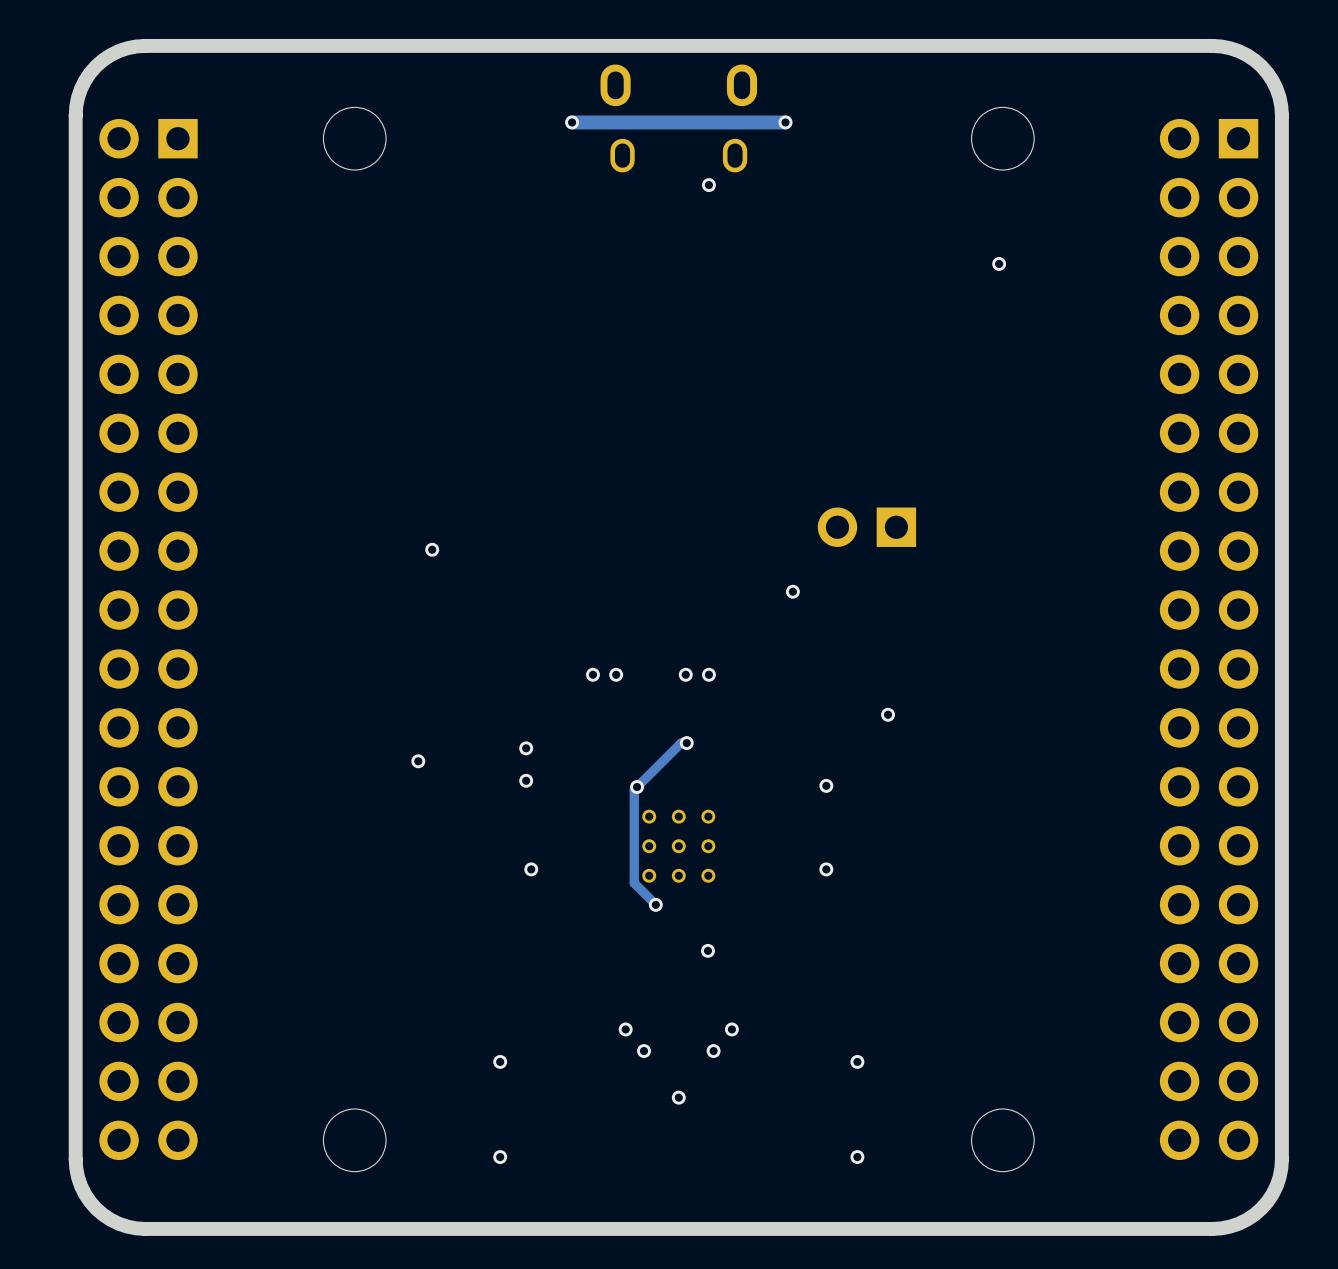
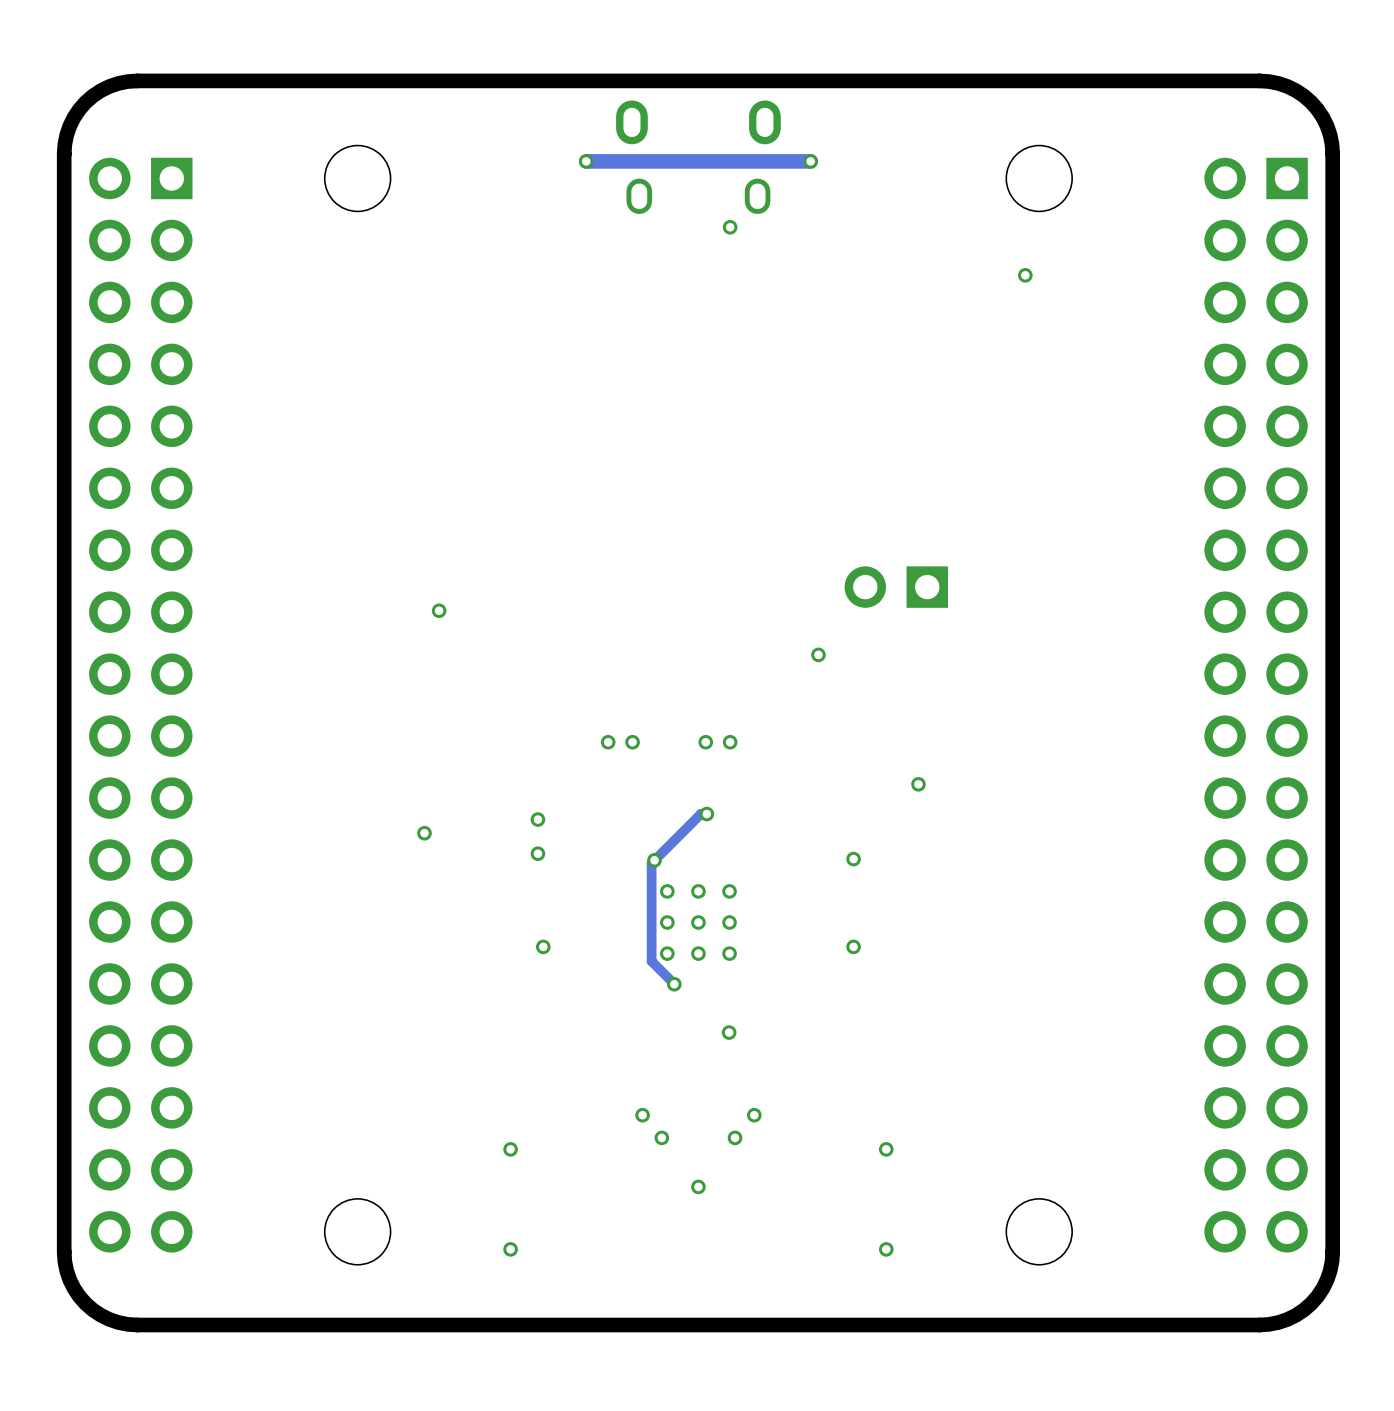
via position: (999, 263) -> (1025, 275)

